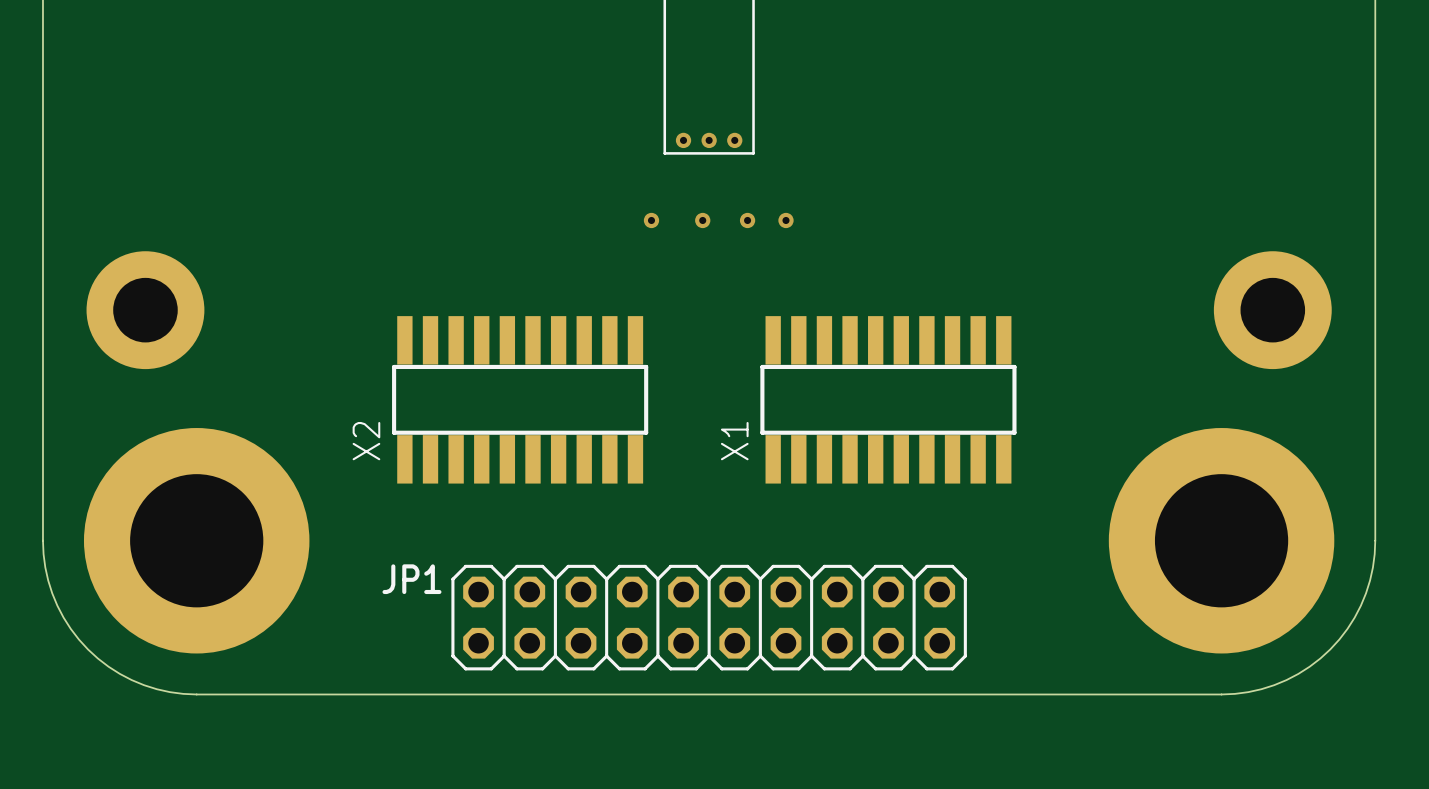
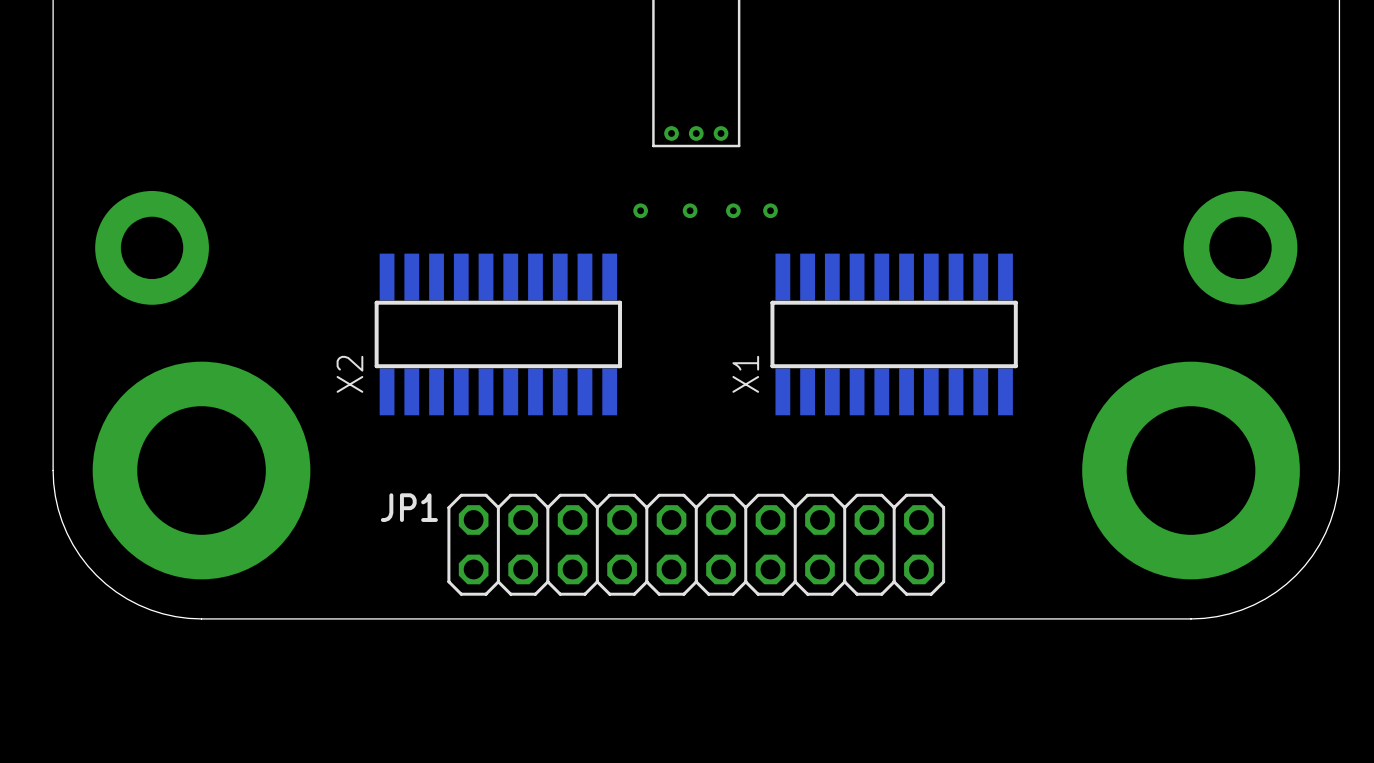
part position: (145, 310) -> (152, 247)
part position: (1272, 310) -> (1240, 247)
X2 position: (520, 399) -> (498, 334)
X1 position: (888, 399) -> (894, 334)
board edge: (1375, 489) (1375, 540) (1372, 567) (1360, 605) (1347, 628) (1320, 658) (1286, 680) (1261, 689) (1221, 694) (196, 694) (170, 692) (131, 680) (108, 666) (88, 649) (63, 617) (52, 593) (45, 567) (42, 540) (42, 489) -> (1339, 470) (1334, 508) (1325, 533) (1312, 555) (1295, 575) (1276, 592) (1253, 605) (1229, 613) (1191, 618) (188, 618) (163, 613) (138, 605) (116, 592) (96, 575) (79, 555) (67, 533) (58, 508) (53, 470)
part position: (196, 540) -> (201, 470)
part position: (1221, 540) -> (1191, 470)
JP1 position: (709, 617) -> (696, 544)

